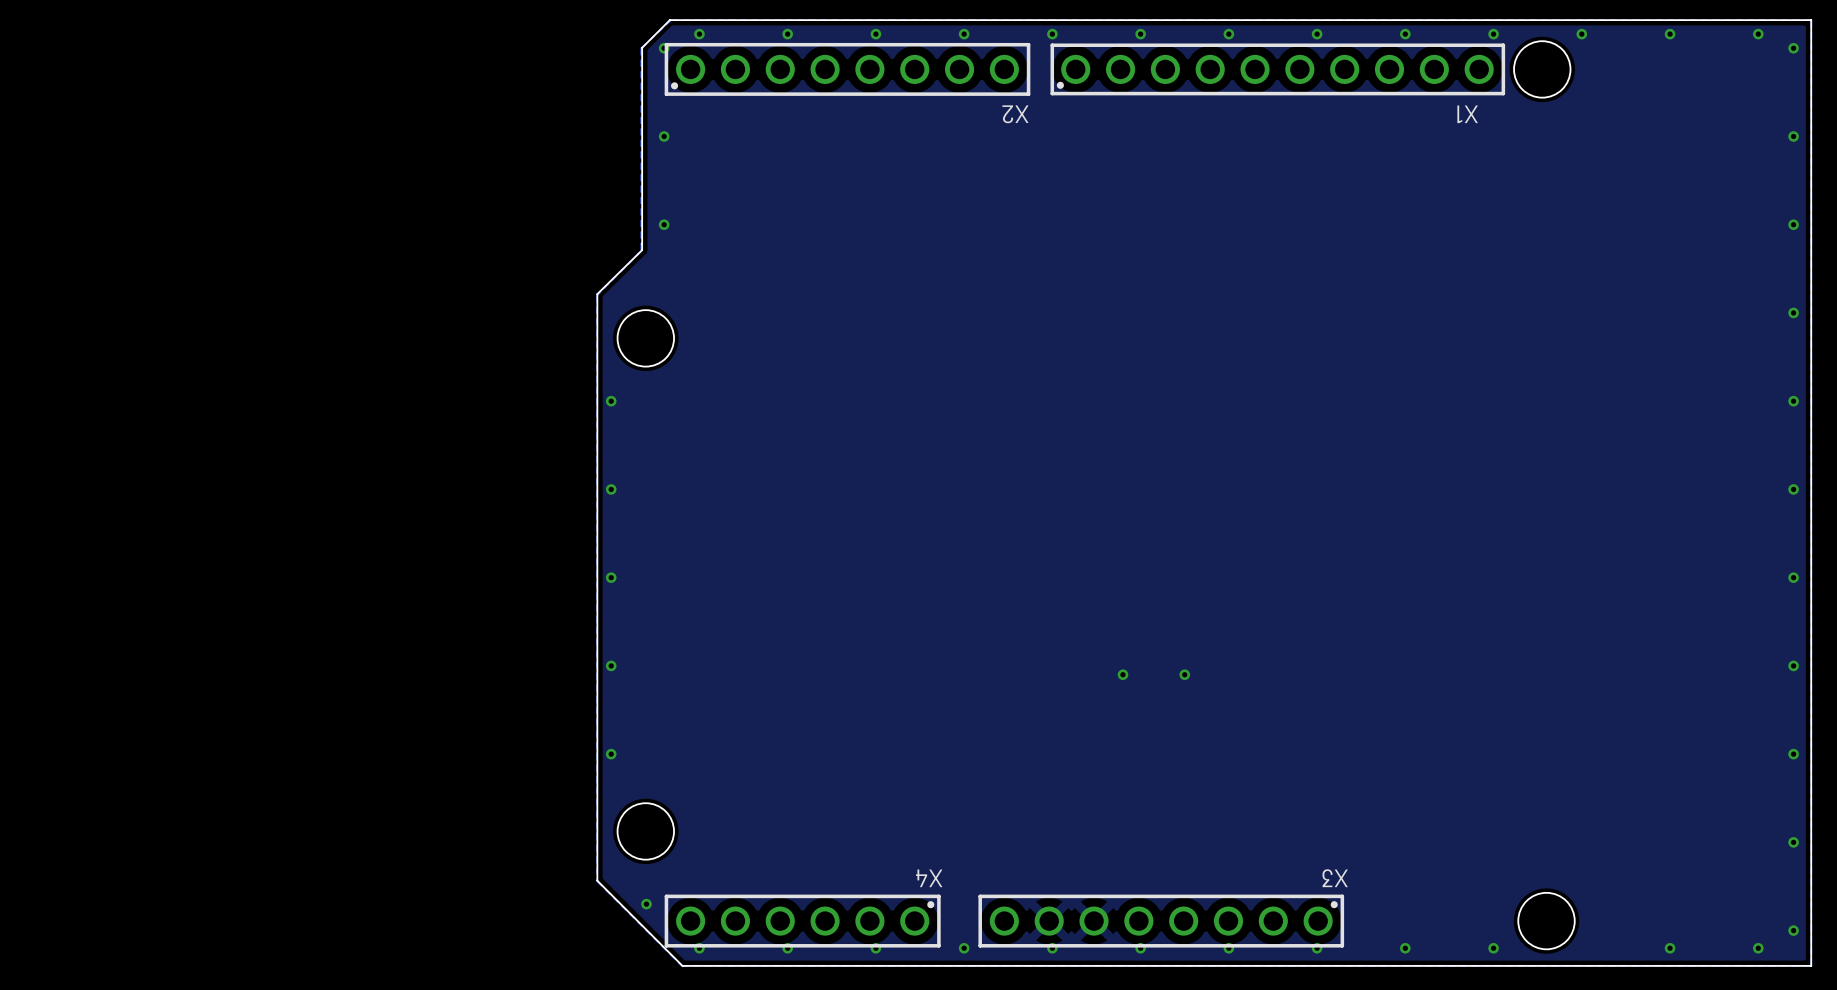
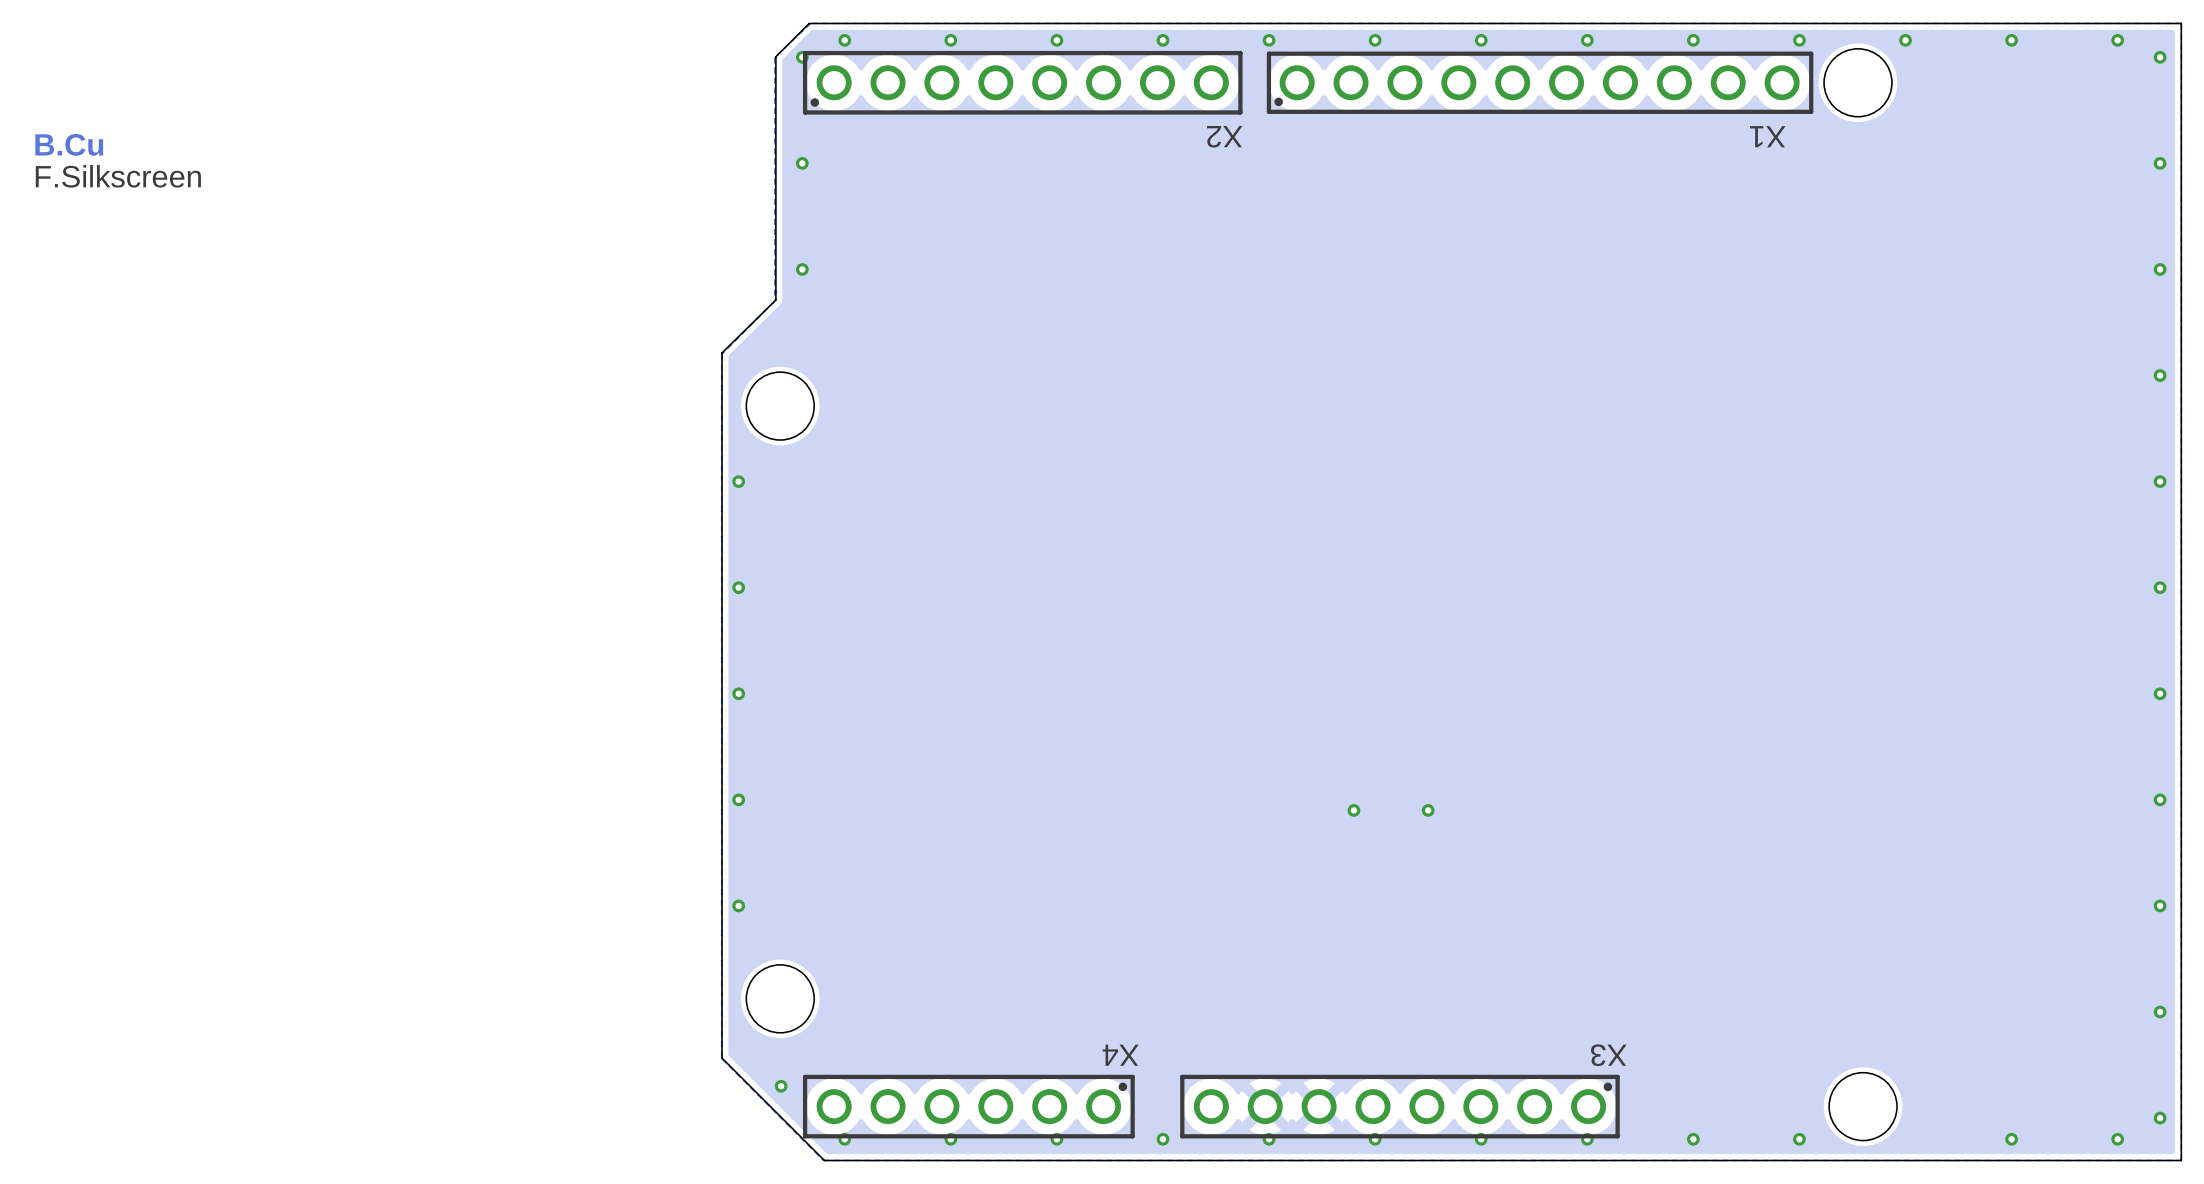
text: none -> B.Cu (69, 144)
text: none -> F.Silkscreen (118, 176)

